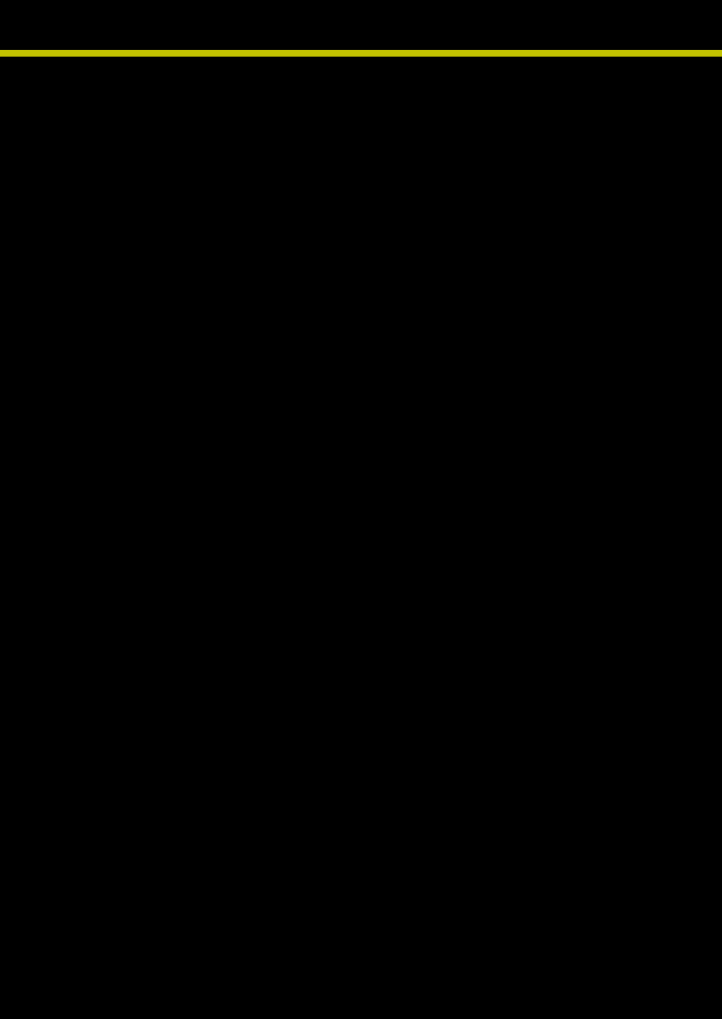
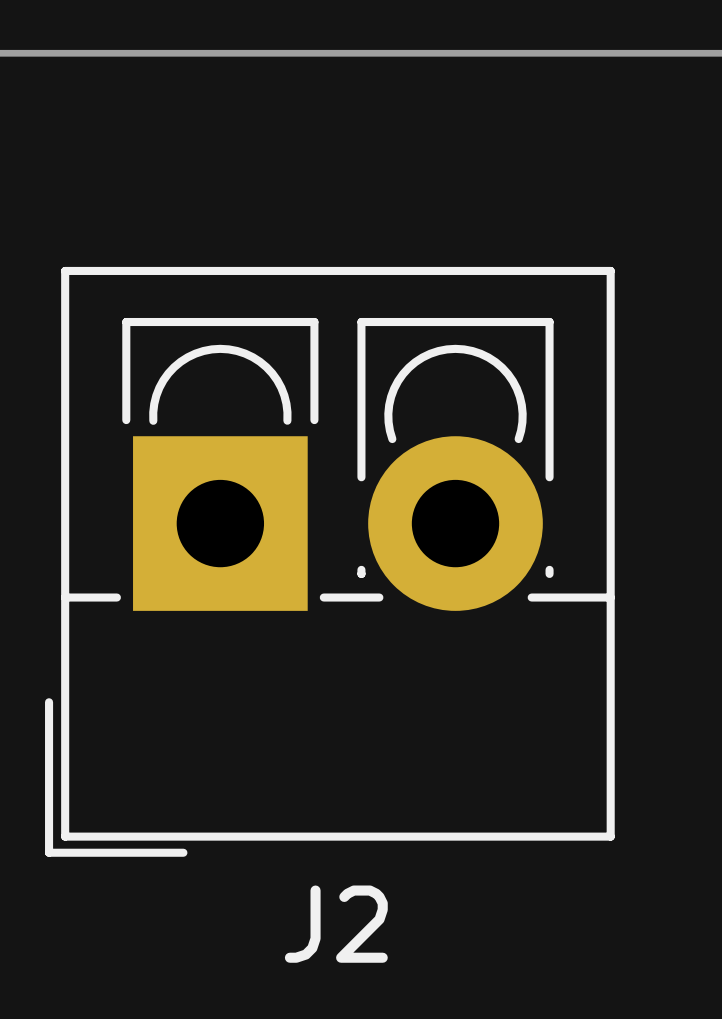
J2: none -> (329, 561)

